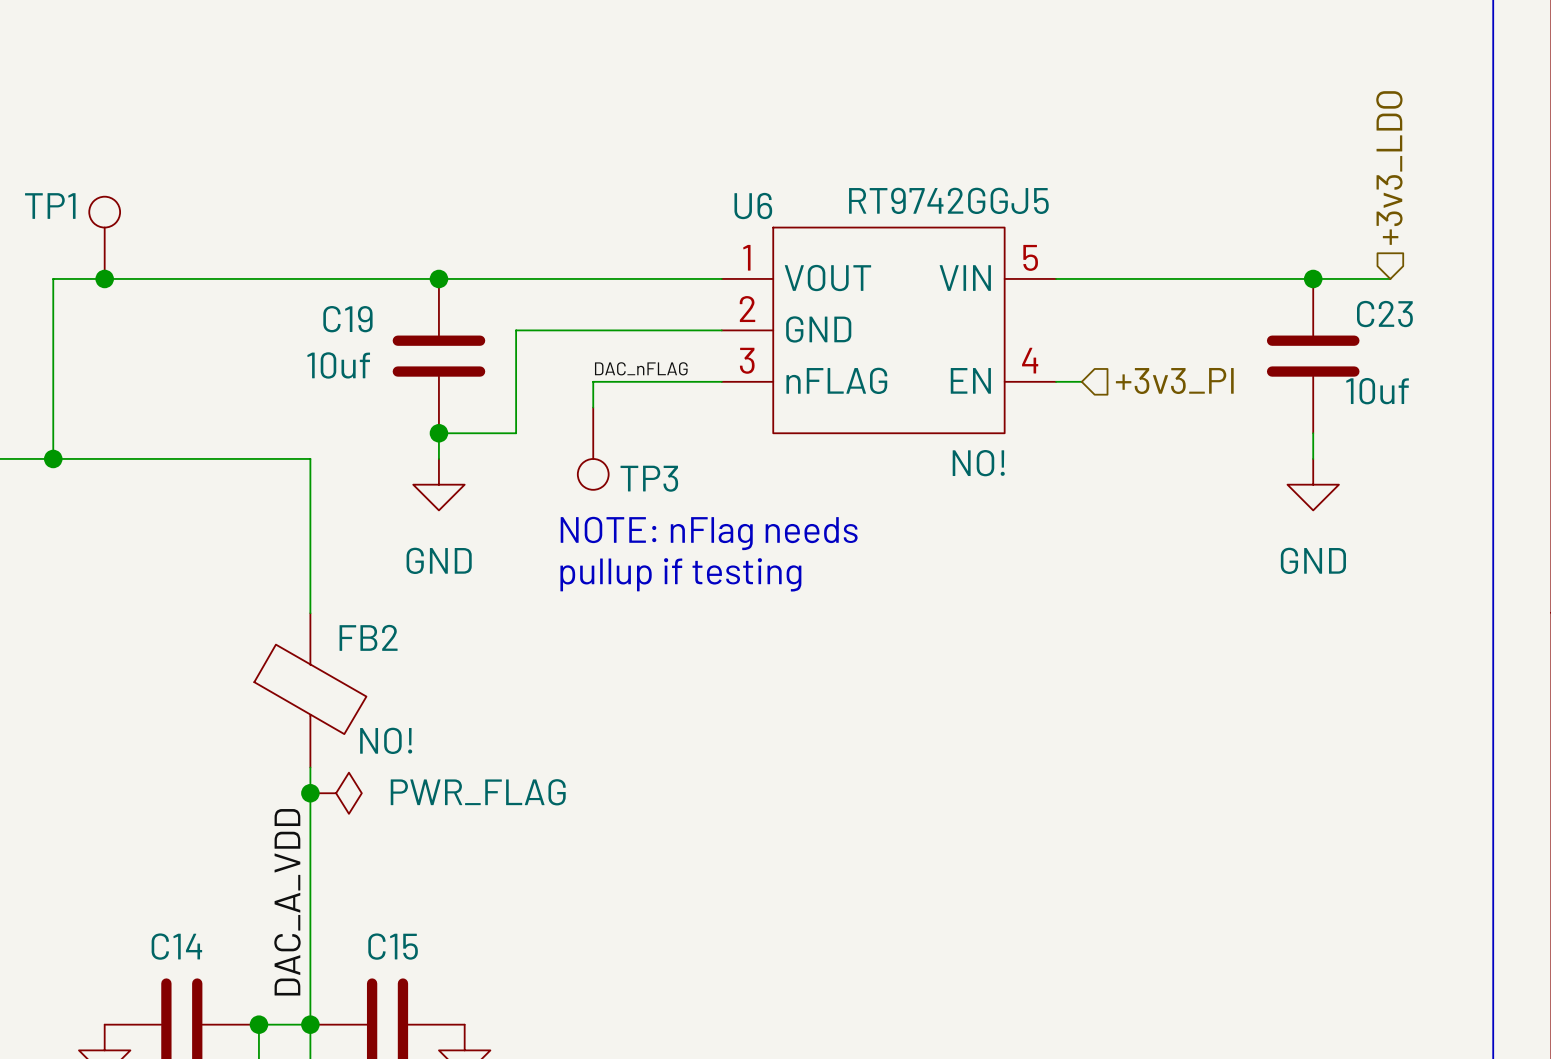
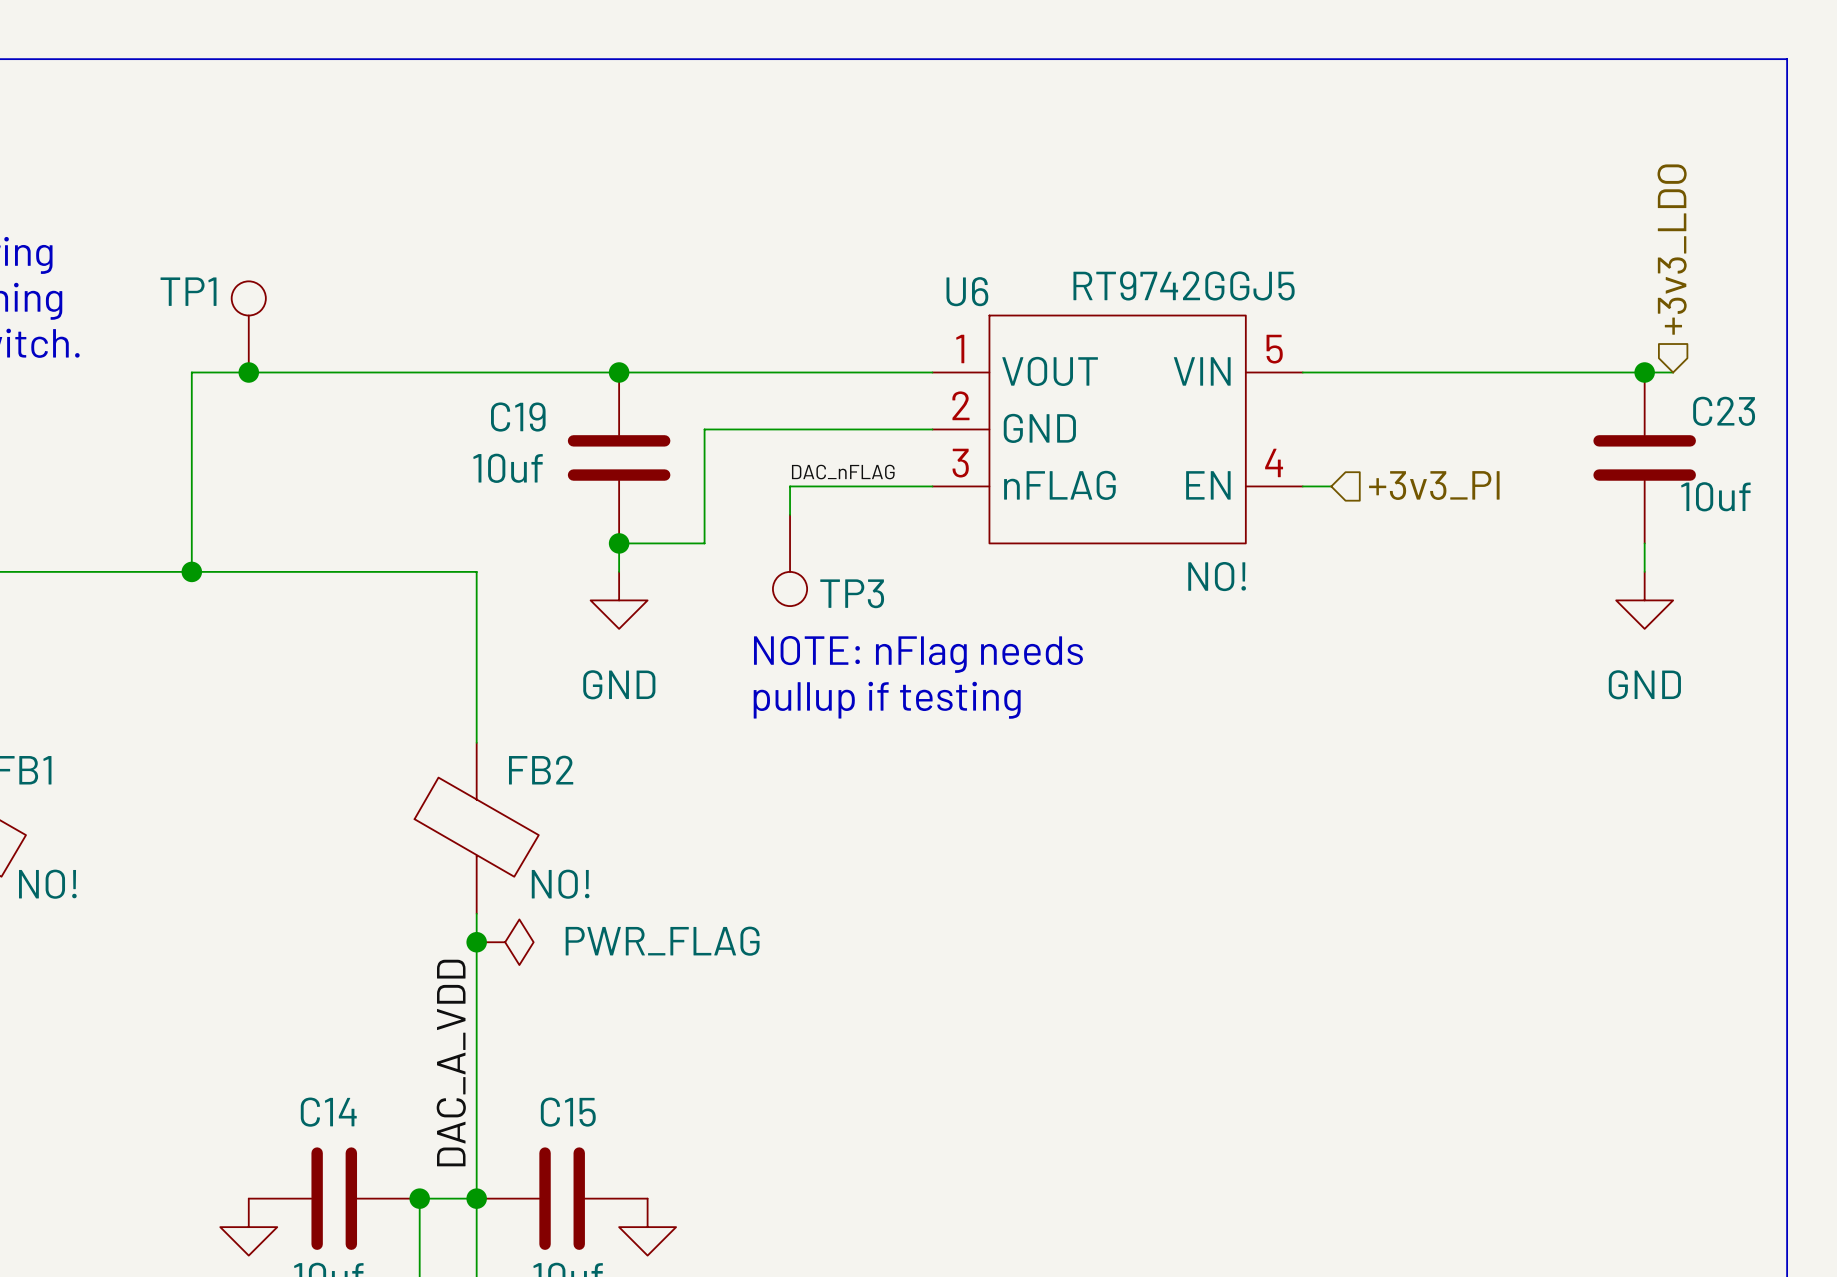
junction position: (1313, 278) -> (1644, 372)
C23 position: (1313, 356) -> (1644, 457)
wire: (1313, 433) (1313, 458) -> (1644, 543) (1644, 571)
power symbol position: GND (1313, 484) -> GND (1644, 600)

